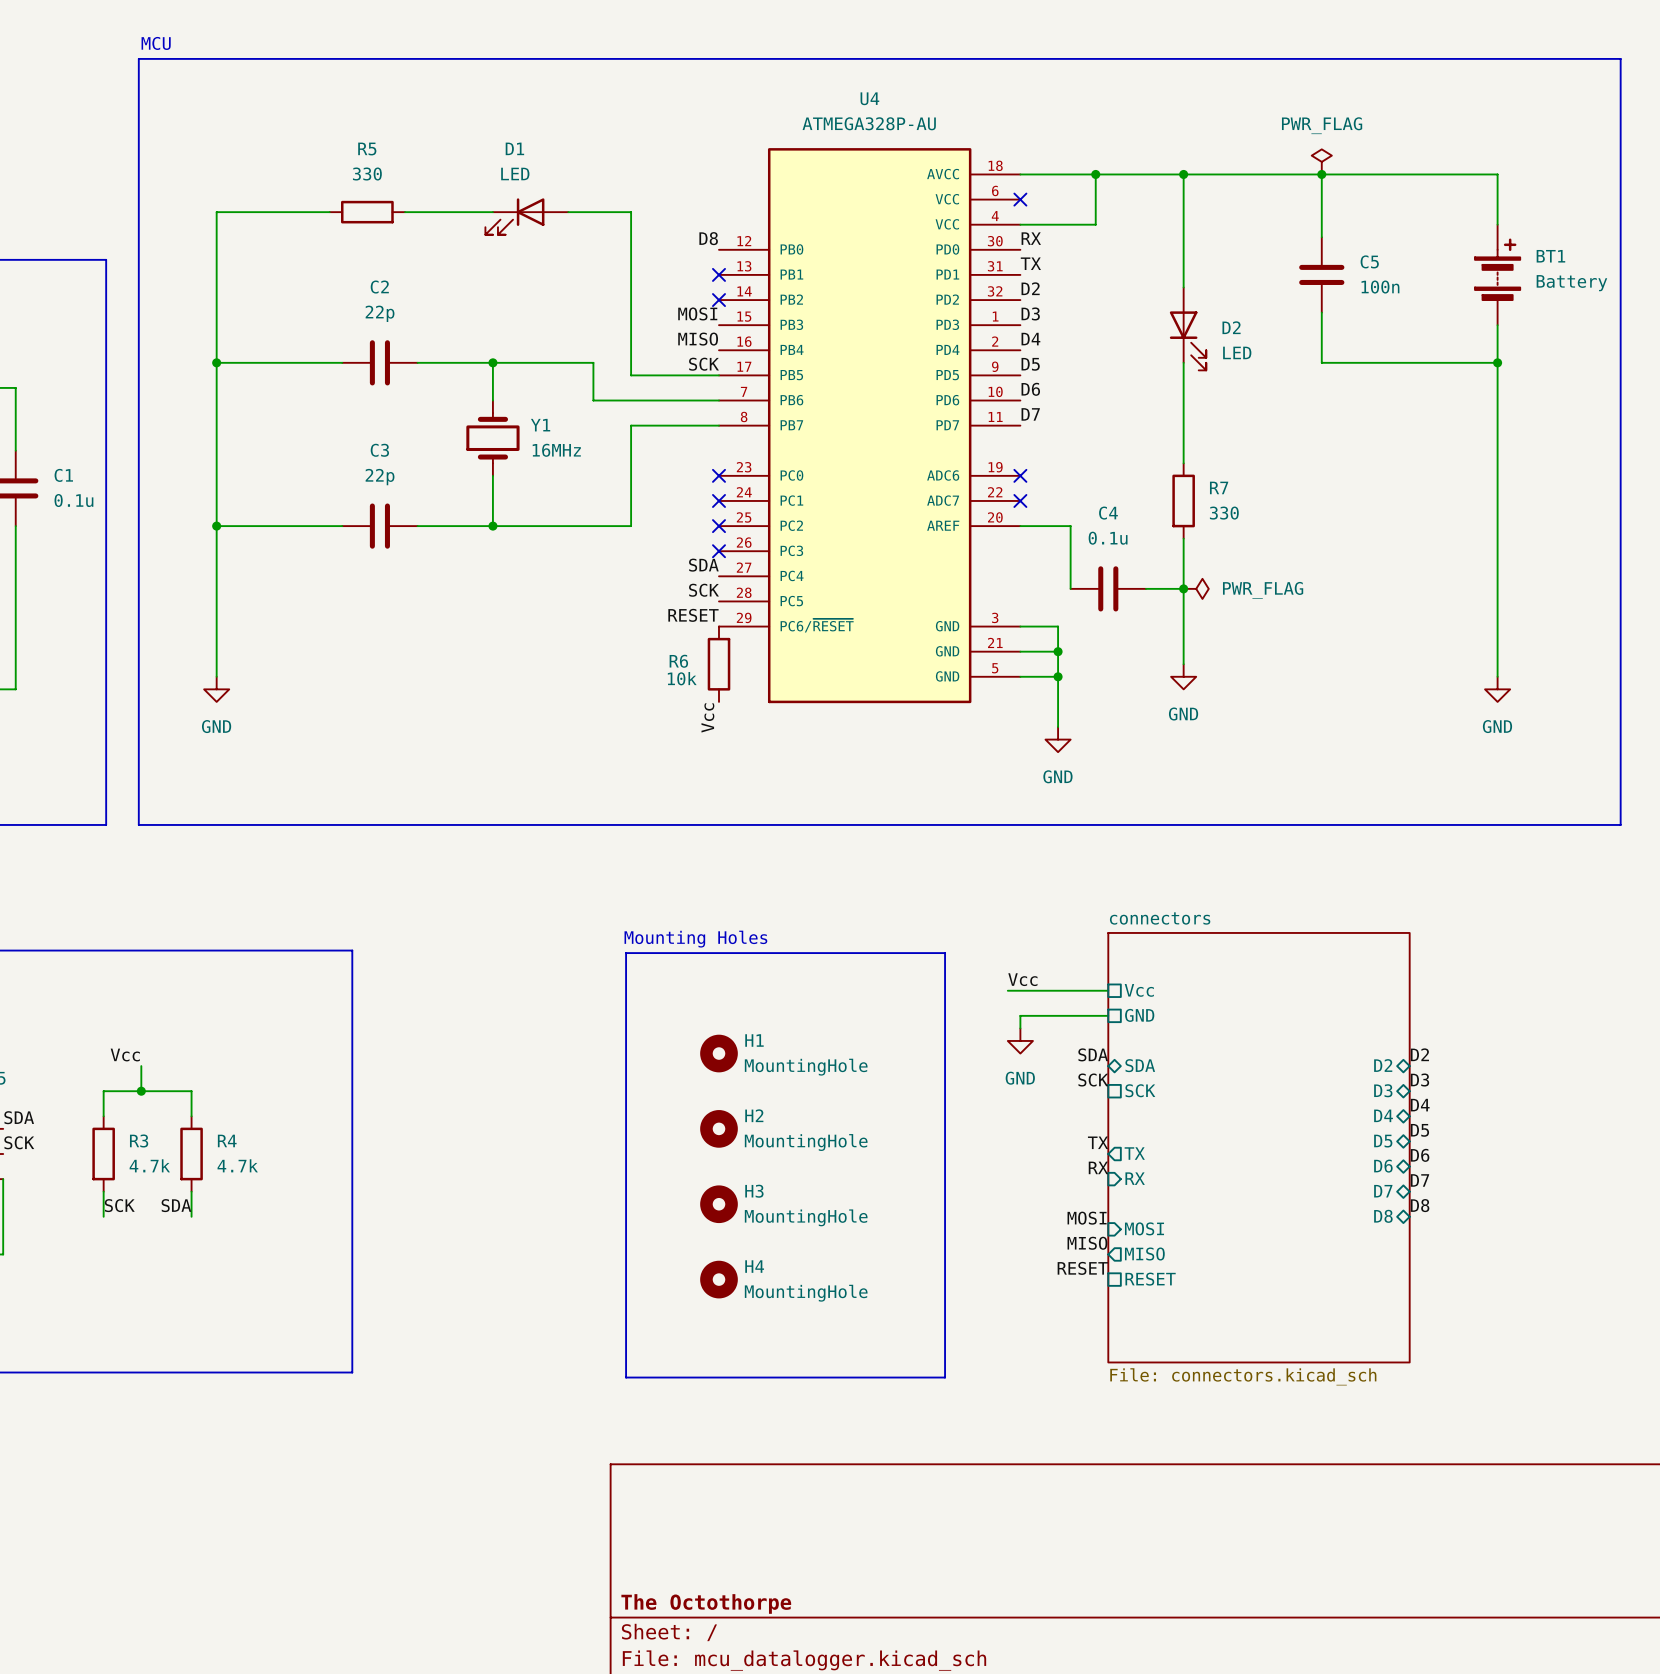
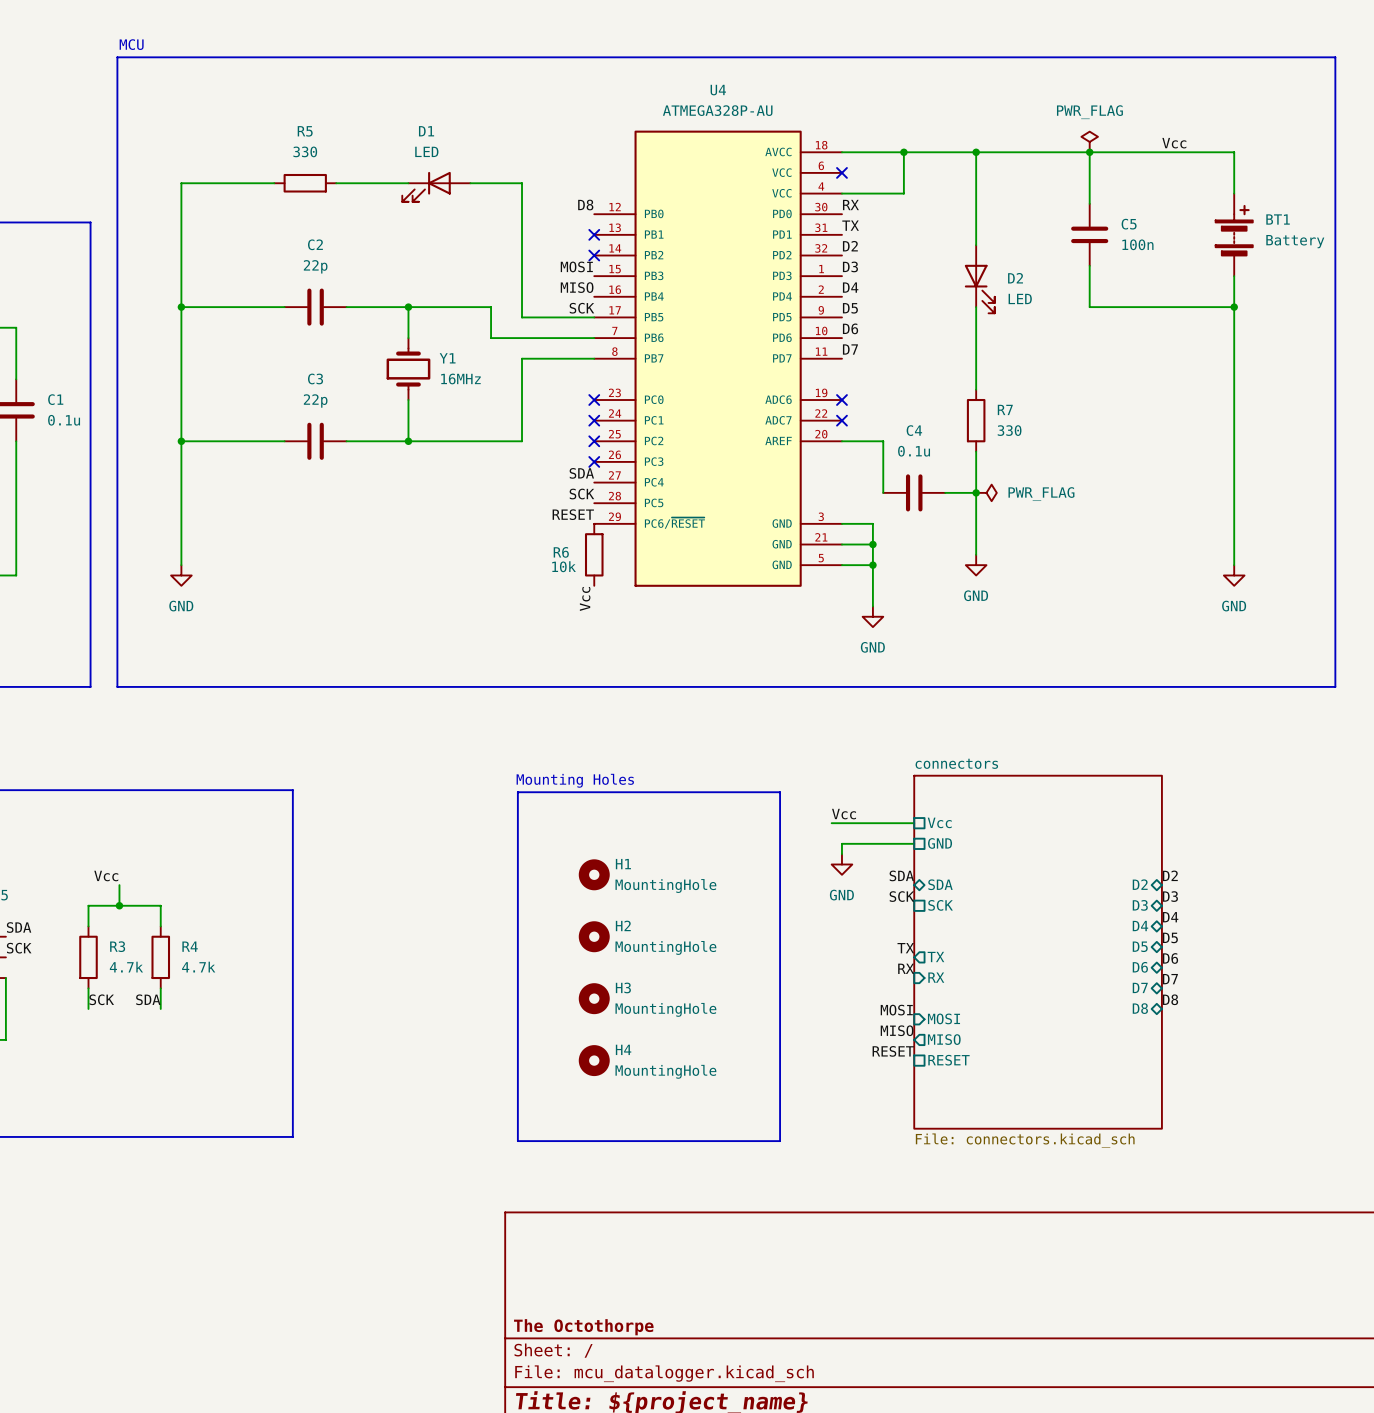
label: none -> Vcc (1174, 143)

